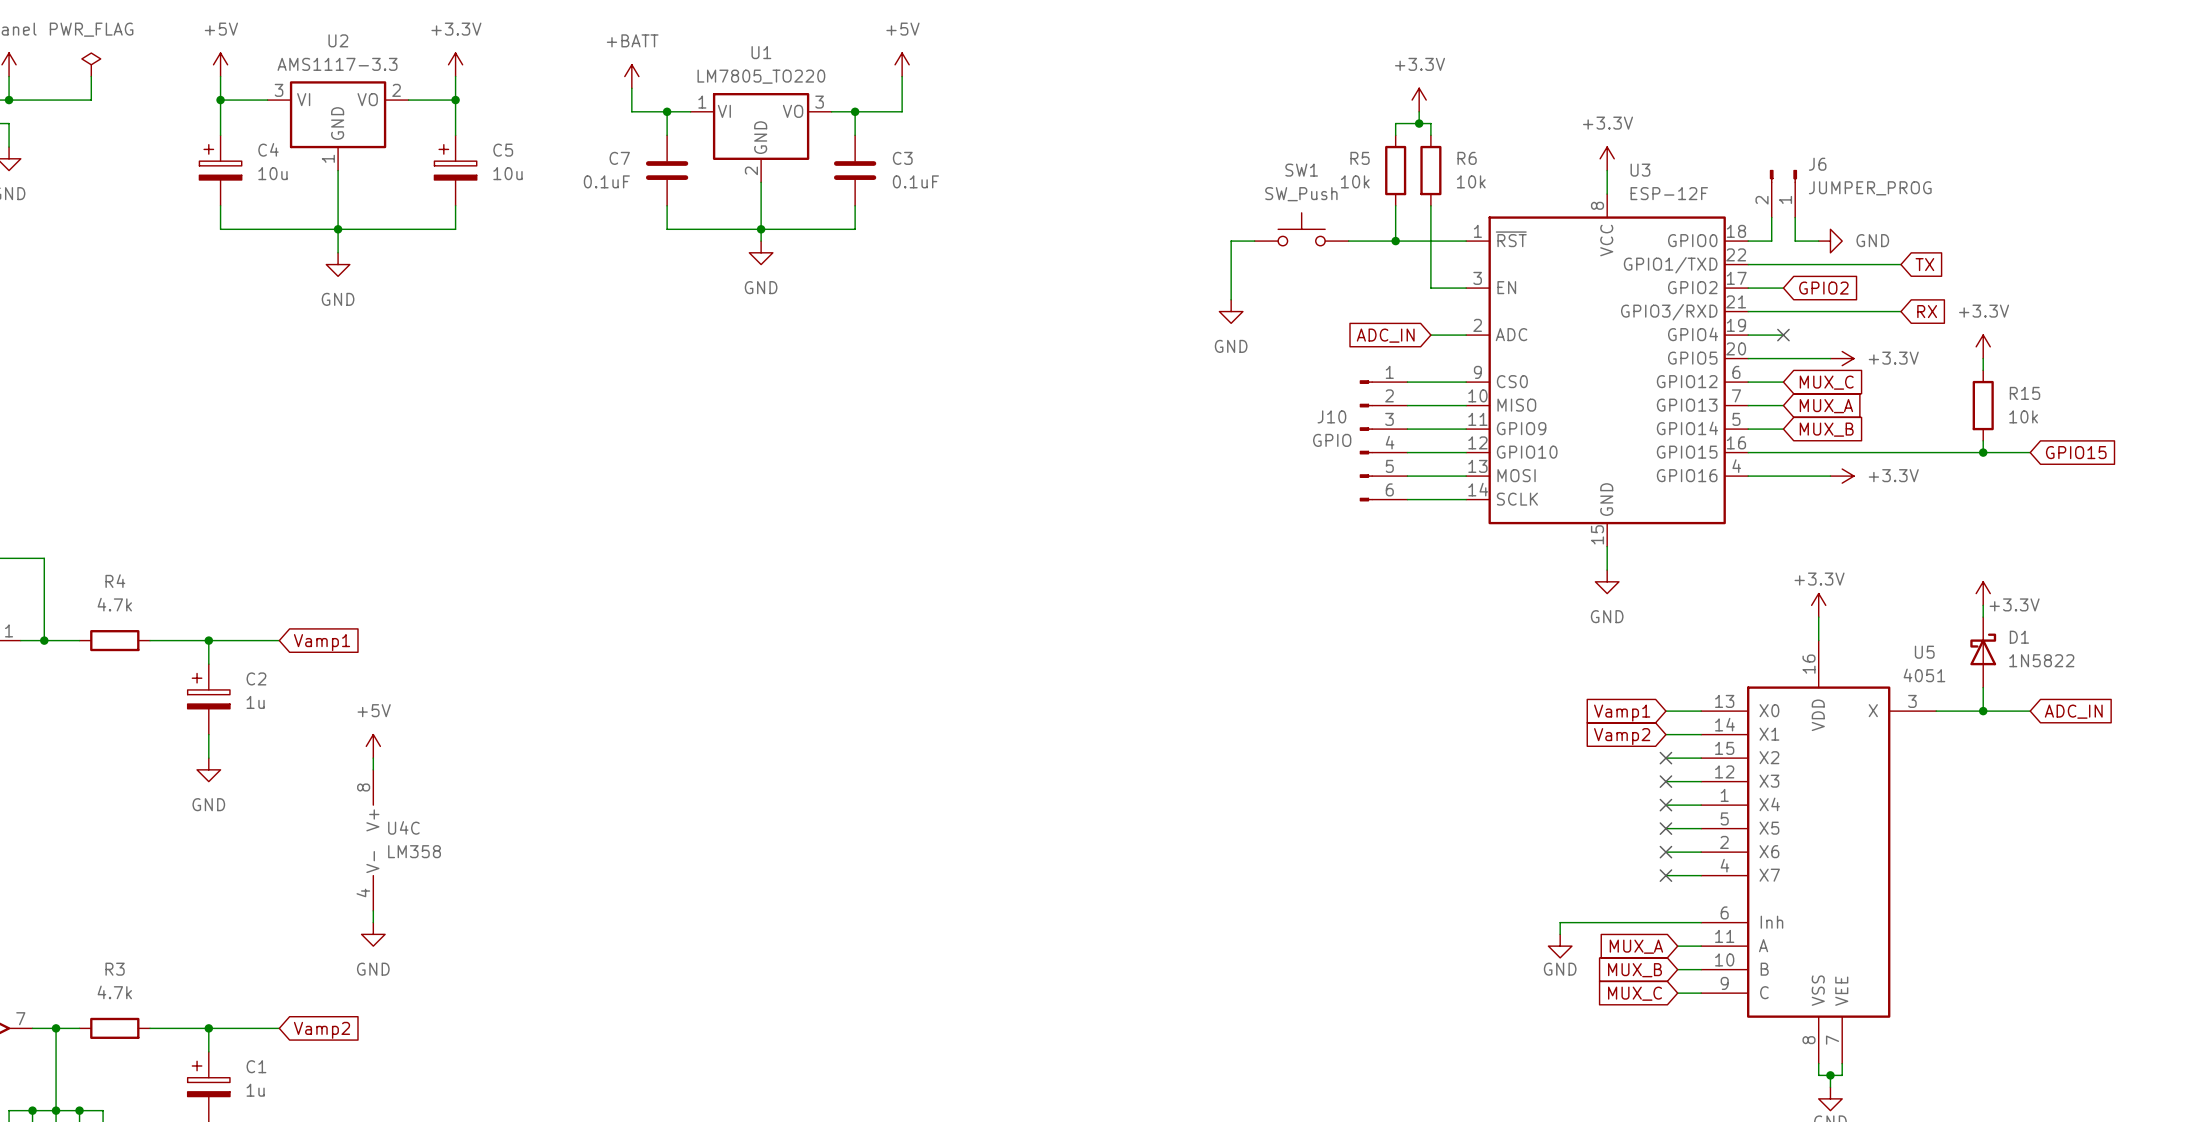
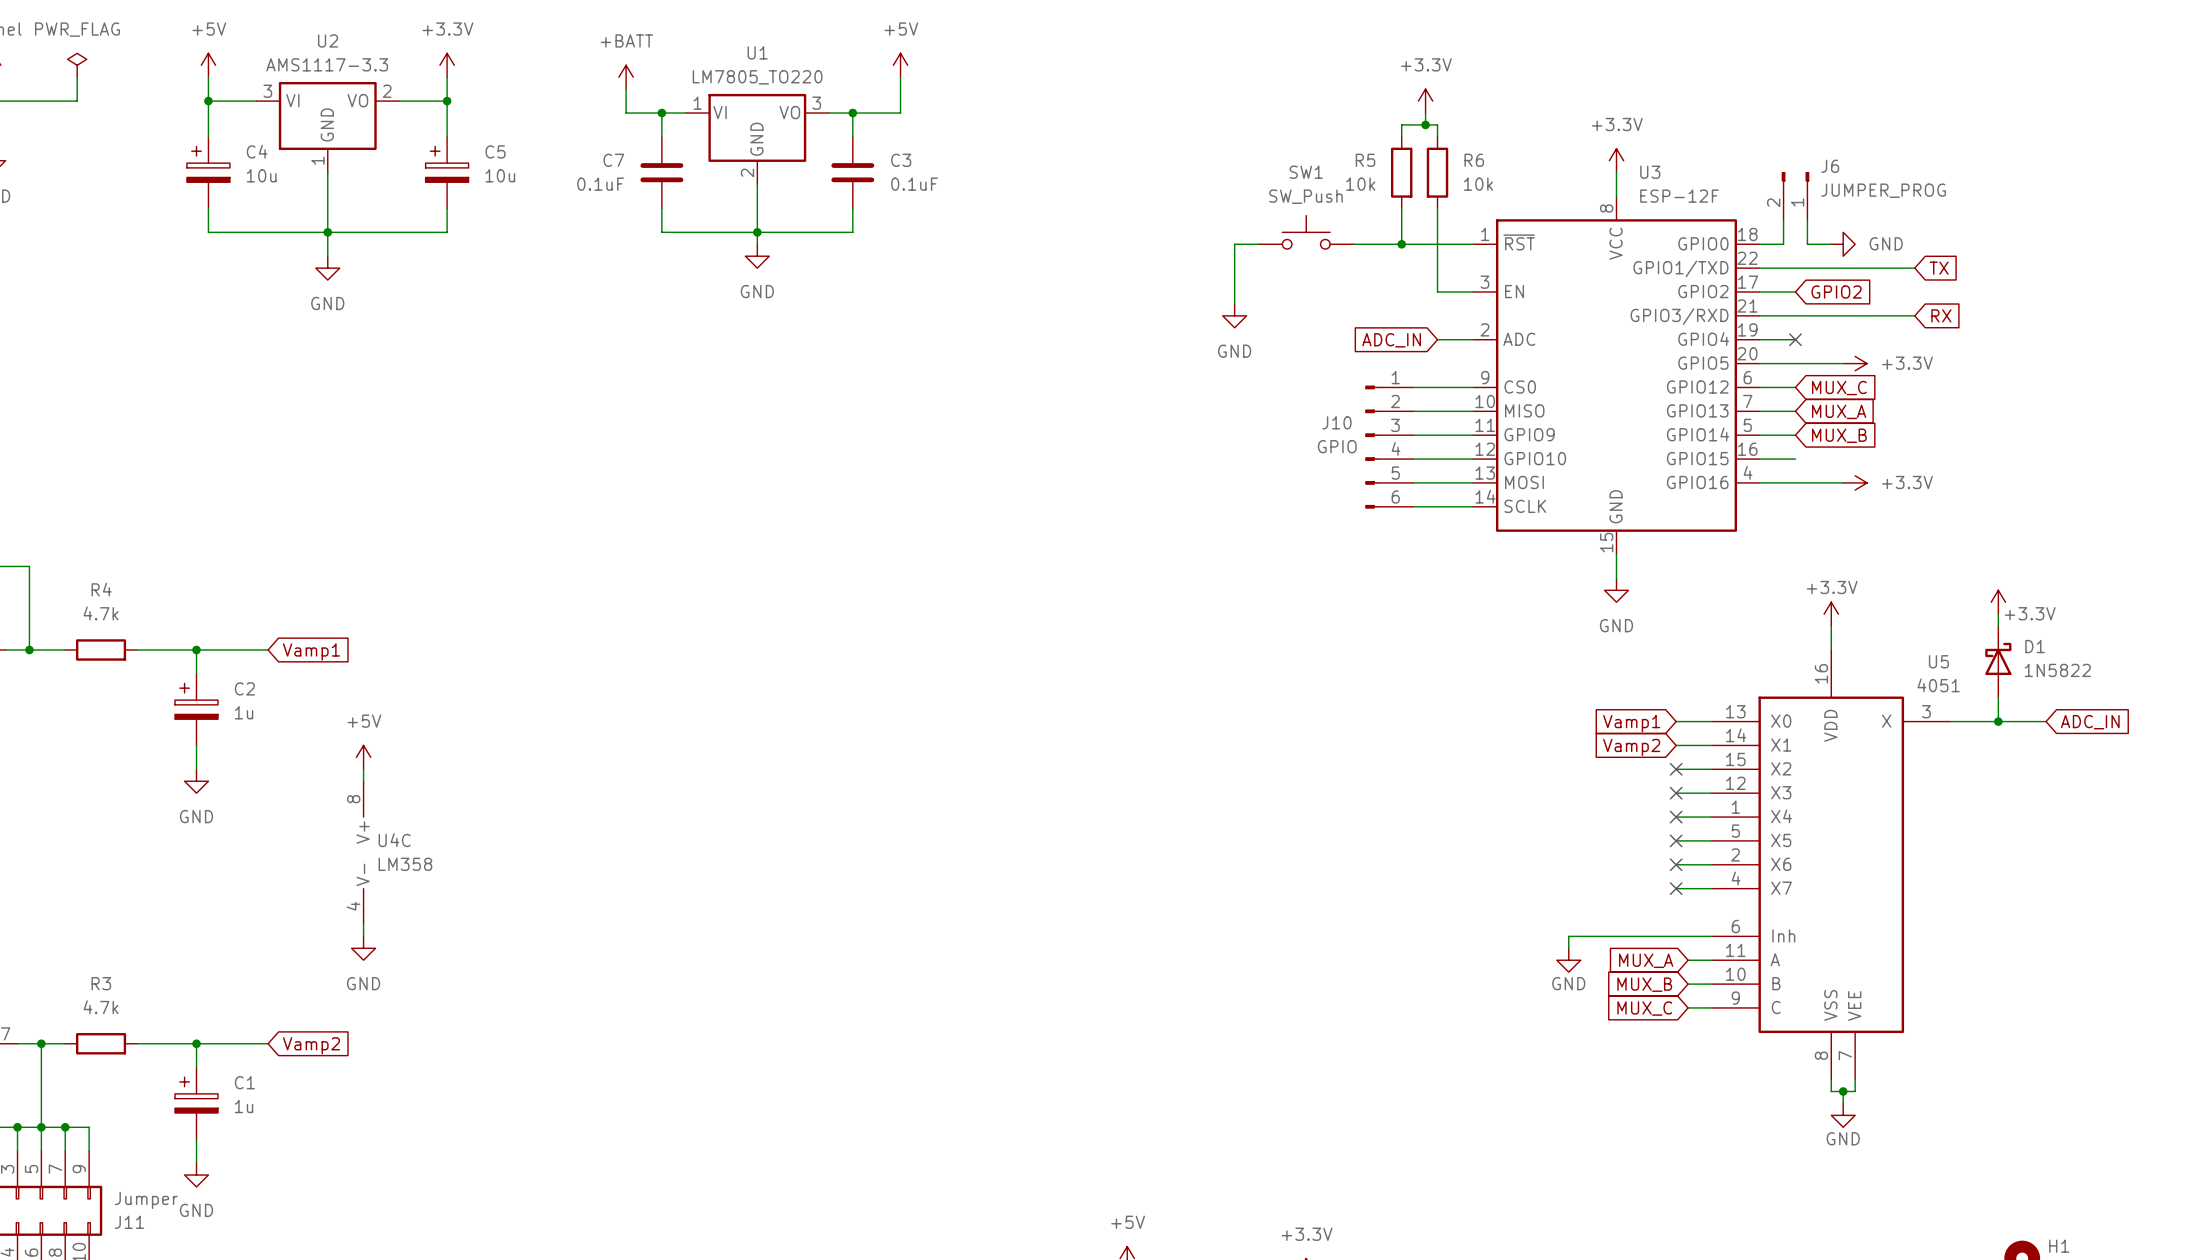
power symbol: +3.3V (1983, 346) -> none
wire: (1983, 358) (1983, 370) -> none
R15: 10k (1983, 405) -> none
wire: (1983, 440) (1983, 452) -> none
wire: (1783, 452) (2030, 452) -> none
junction: (1983, 452) -> none
global label: GPIO15 (2076, 452) -> none

